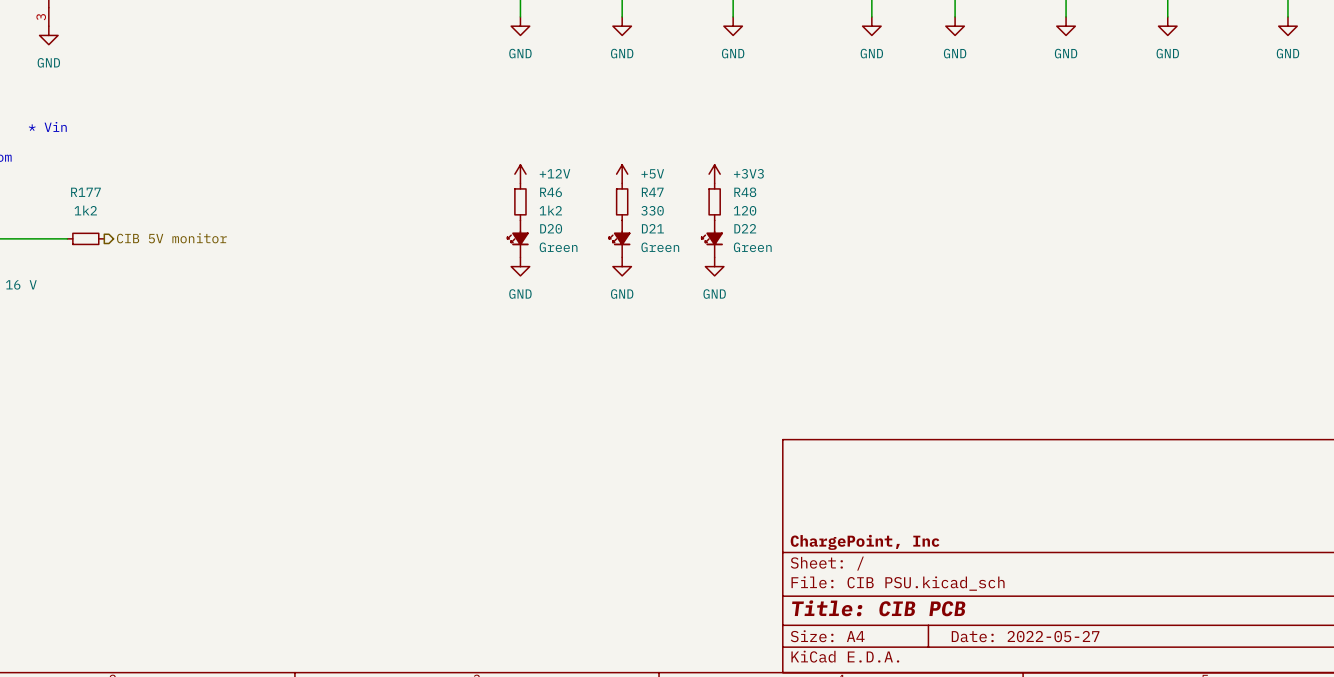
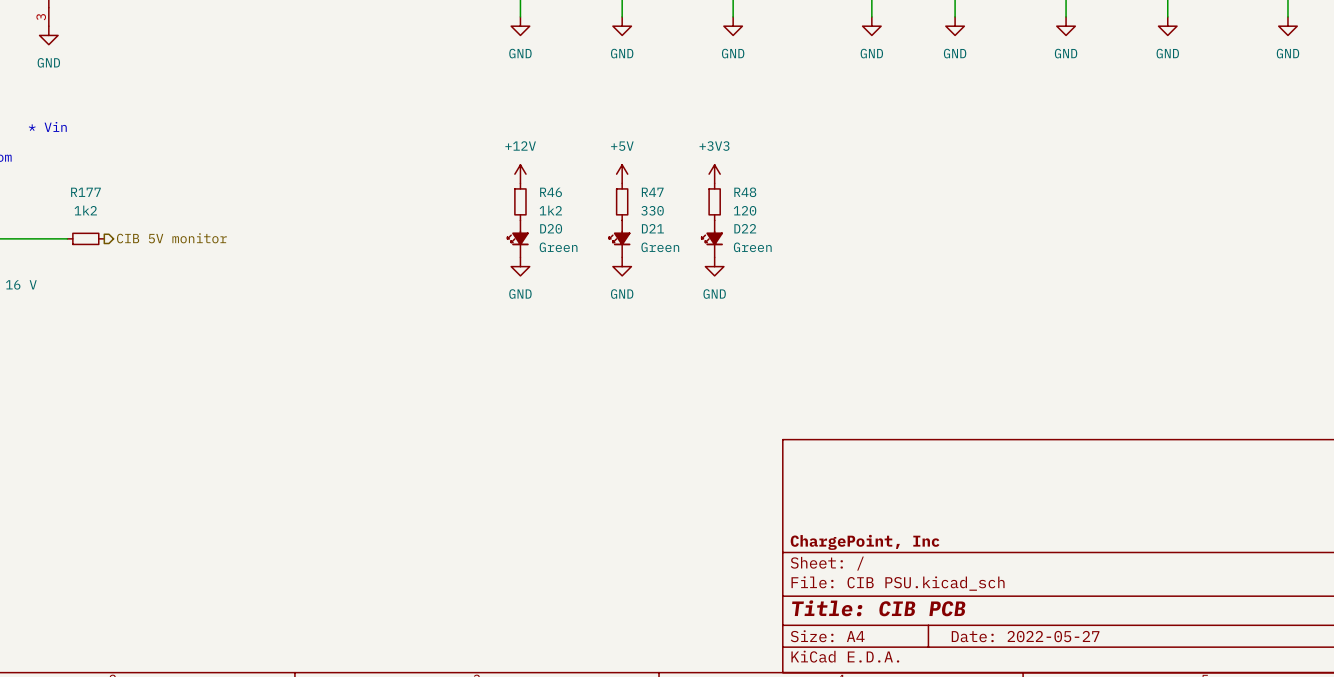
power symbol text position: +12V (555, 173) -> +12V (520, 145)
power symbol text position: +5V (652, 173) -> +5V (622, 146)
power symbol text position: +3V3 (748, 173) -> +3V3 (714, 146)

